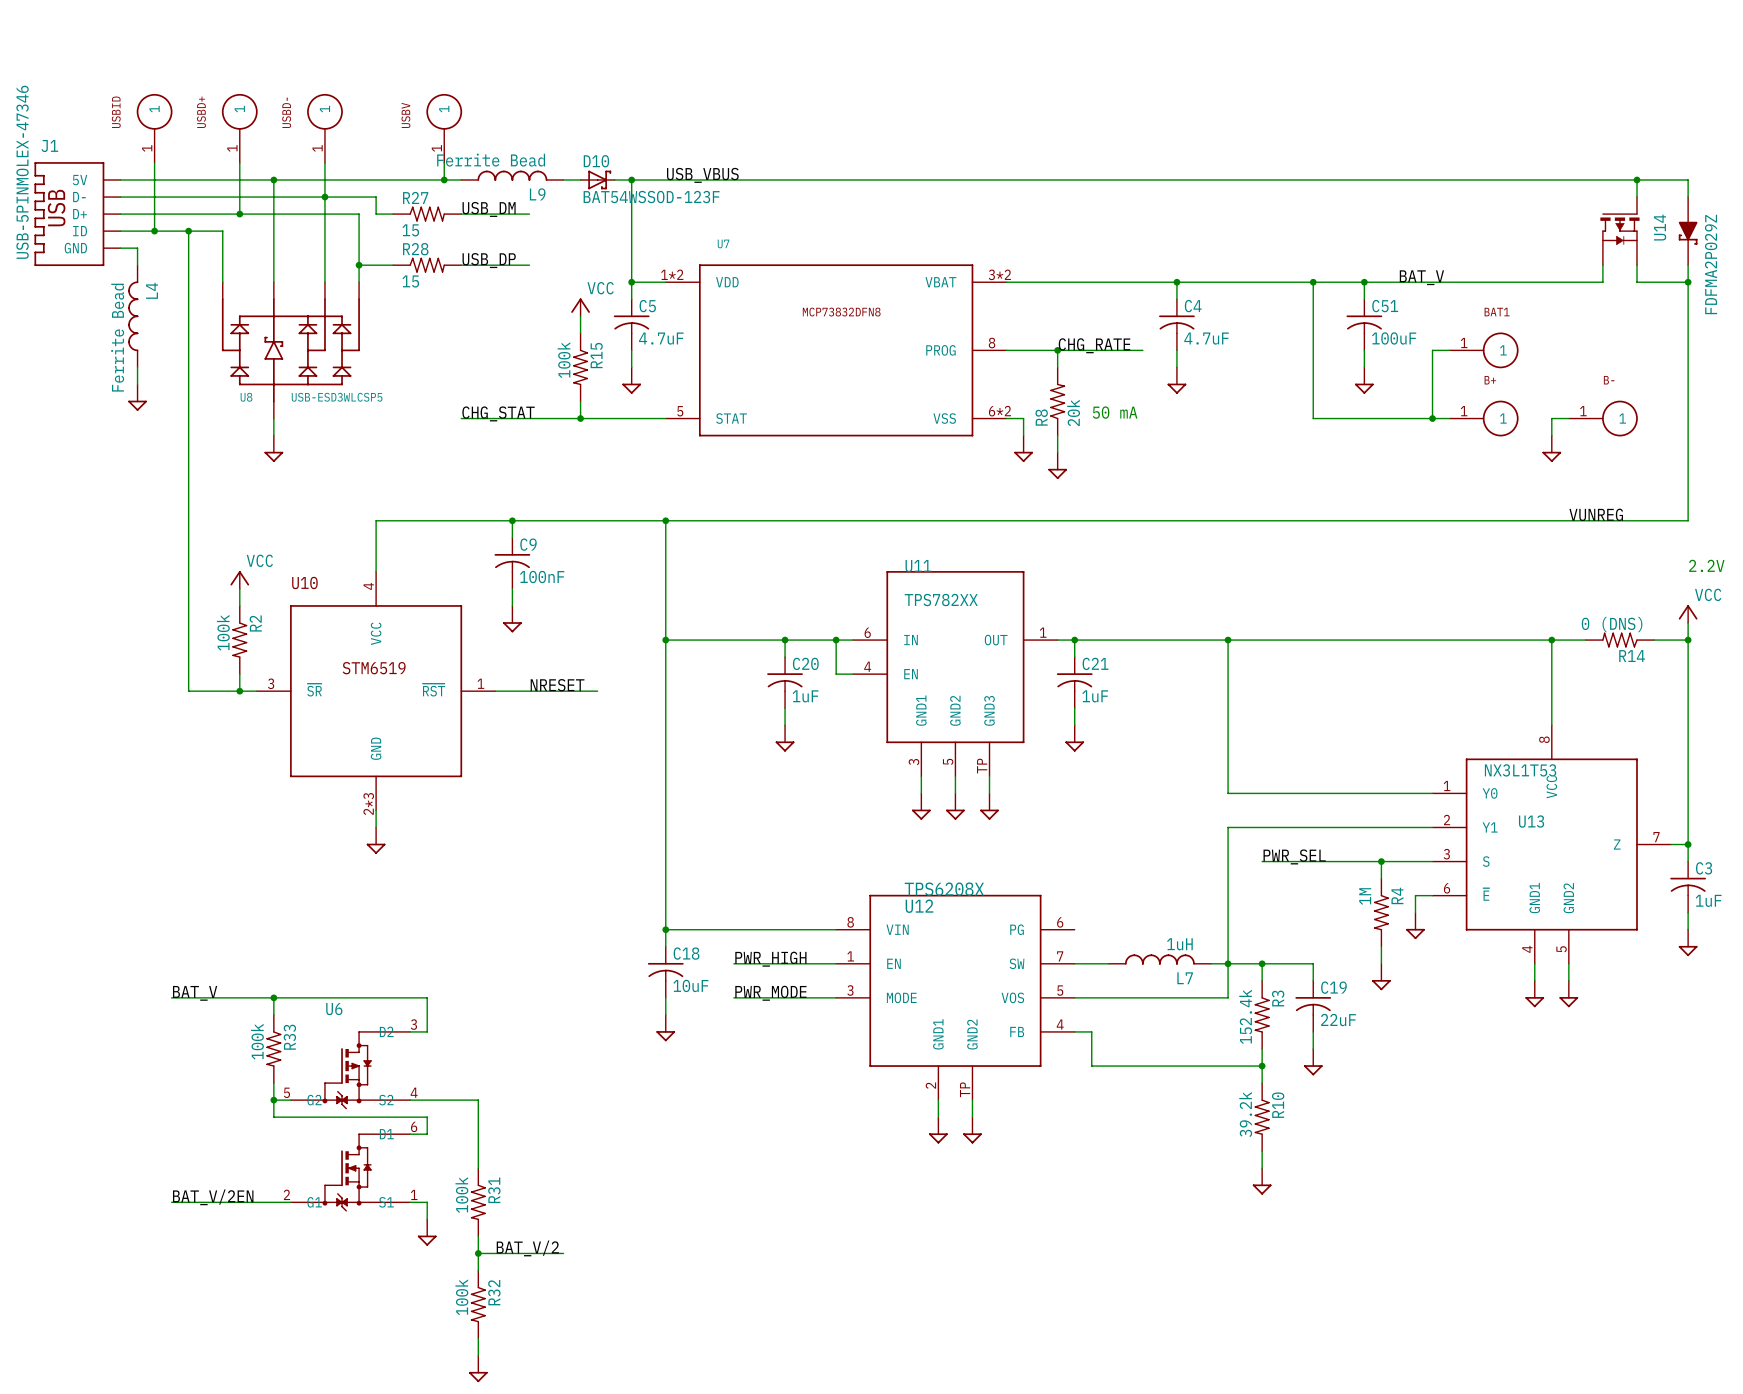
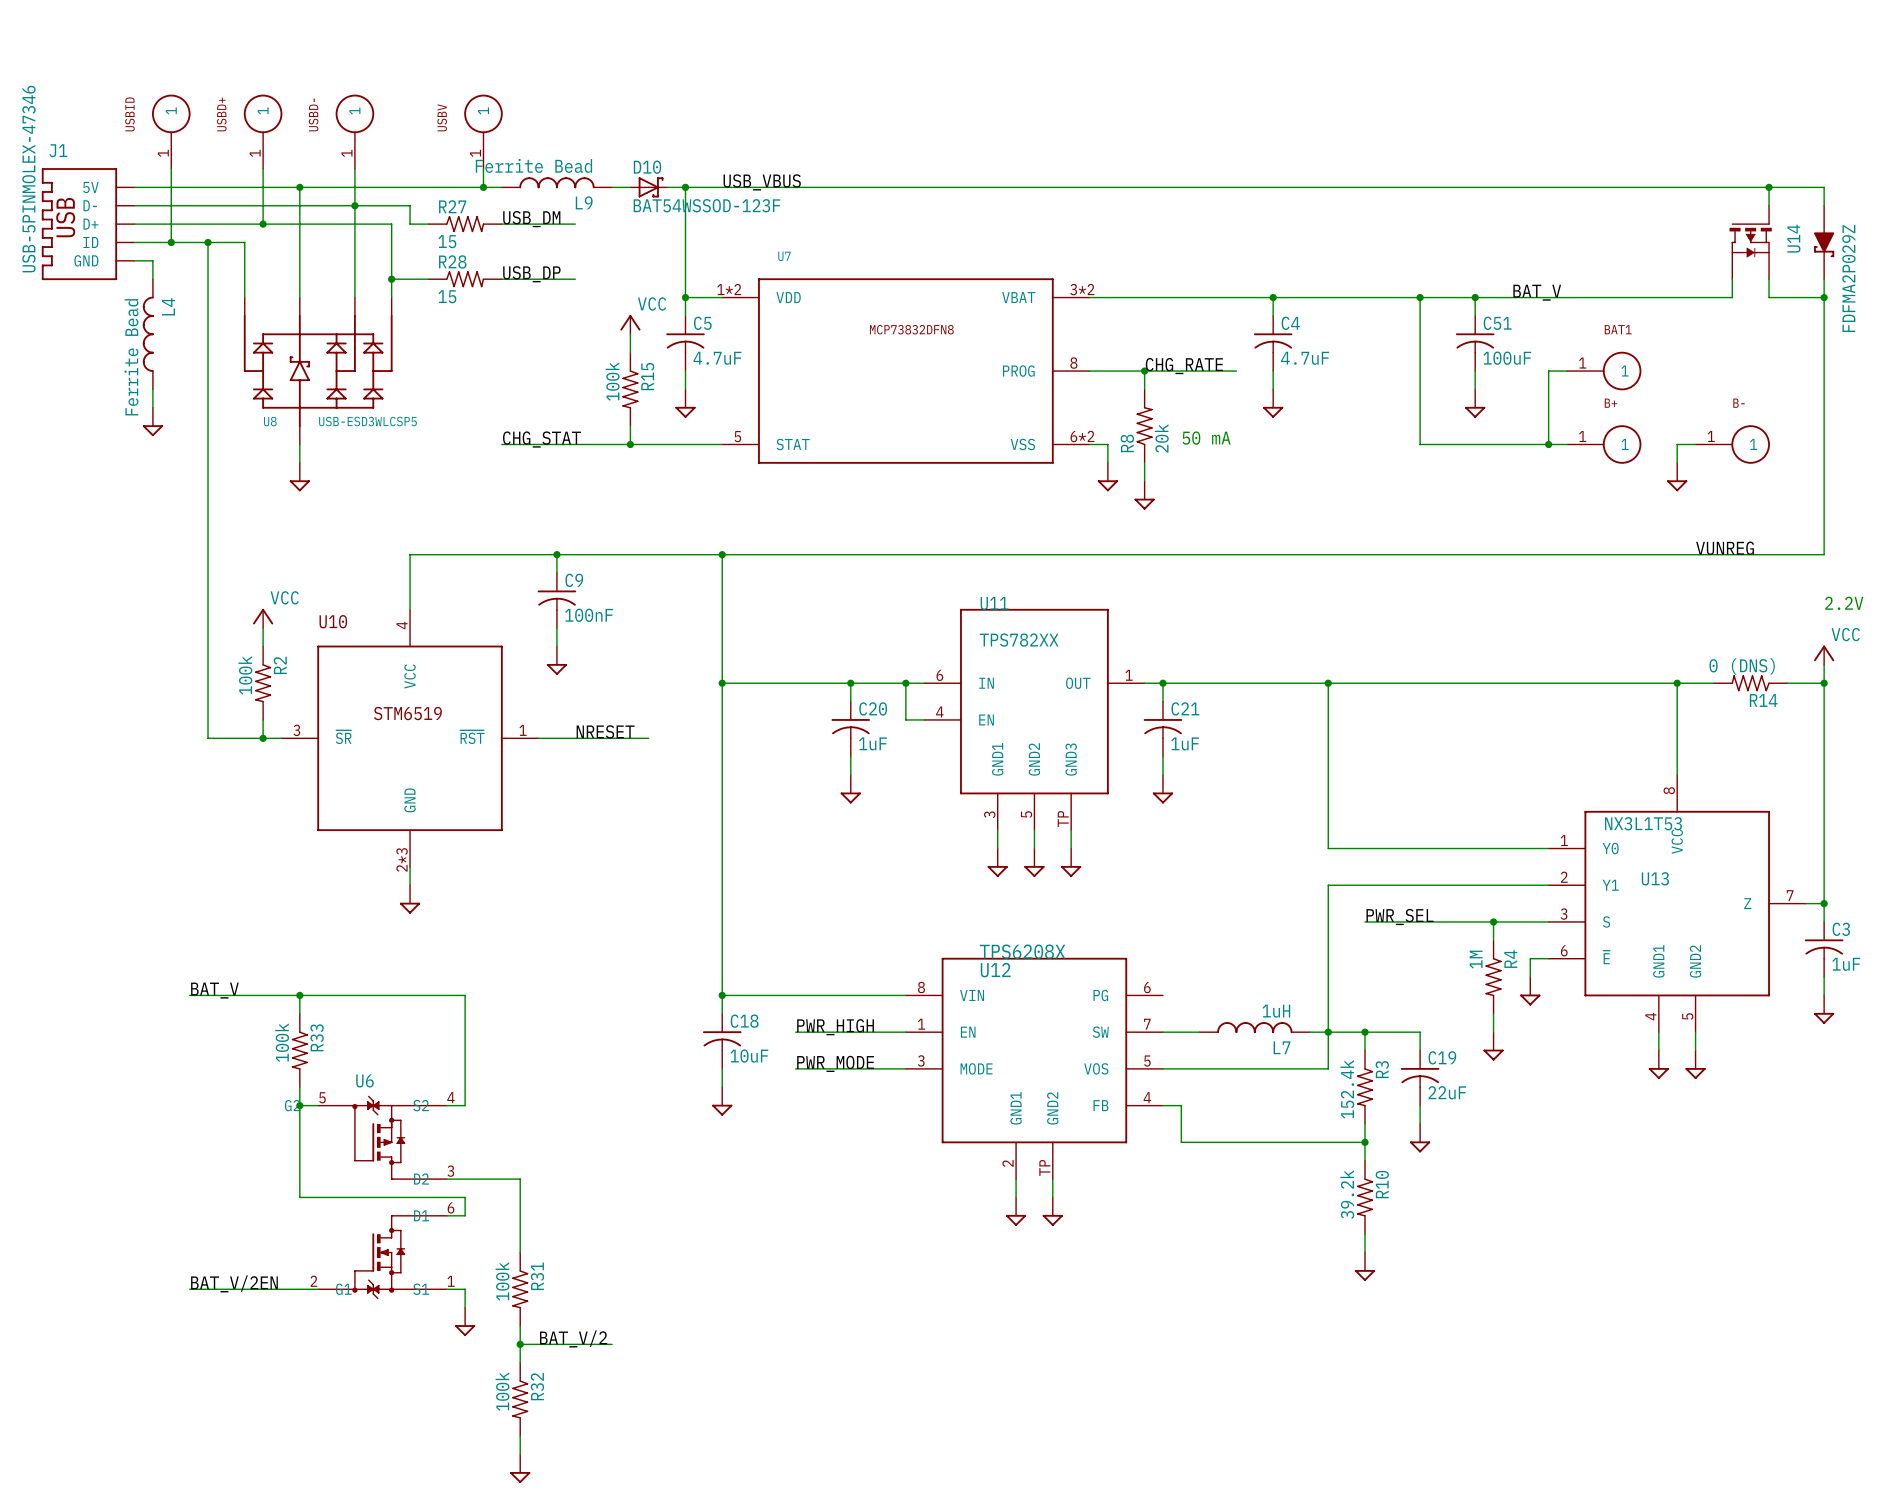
wire: none -> (299, 995) (299, 1013)
junction: none -> (299, 995)
label position: BAT_V (195, 993) -> BAT_V (214, 990)
wire: (171, 997) (427, 997) -> (189, 995) (465, 995) (465, 1068)
junction: (273, 997) -> none
junction: none -> (299, 1105)
U6 symbol: [290, 1031, 411, 1212] -> [317, 1095, 448, 1300]
R33 position: (273, 1048) -> (299, 1050)
wire: (273, 1100) (290, 1100) -> (299, 1105) (318, 1105)
junction: (273, 1100) -> none

